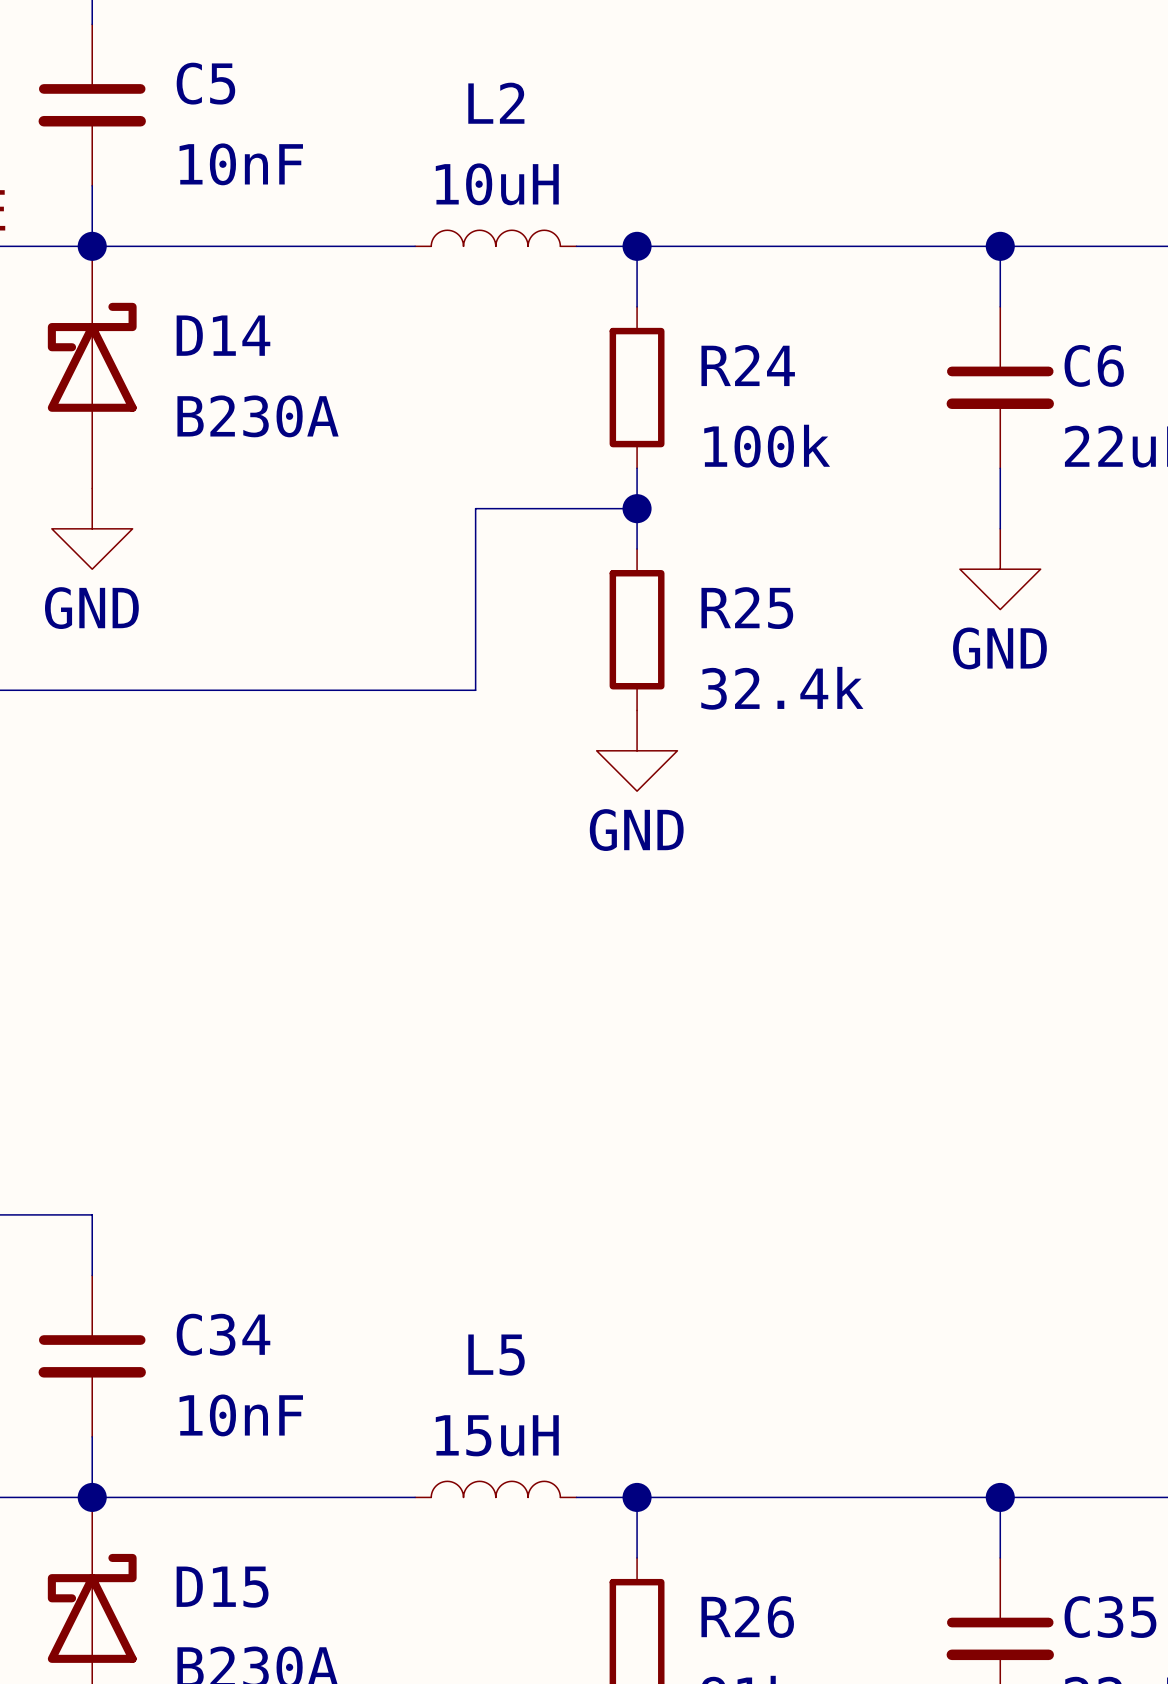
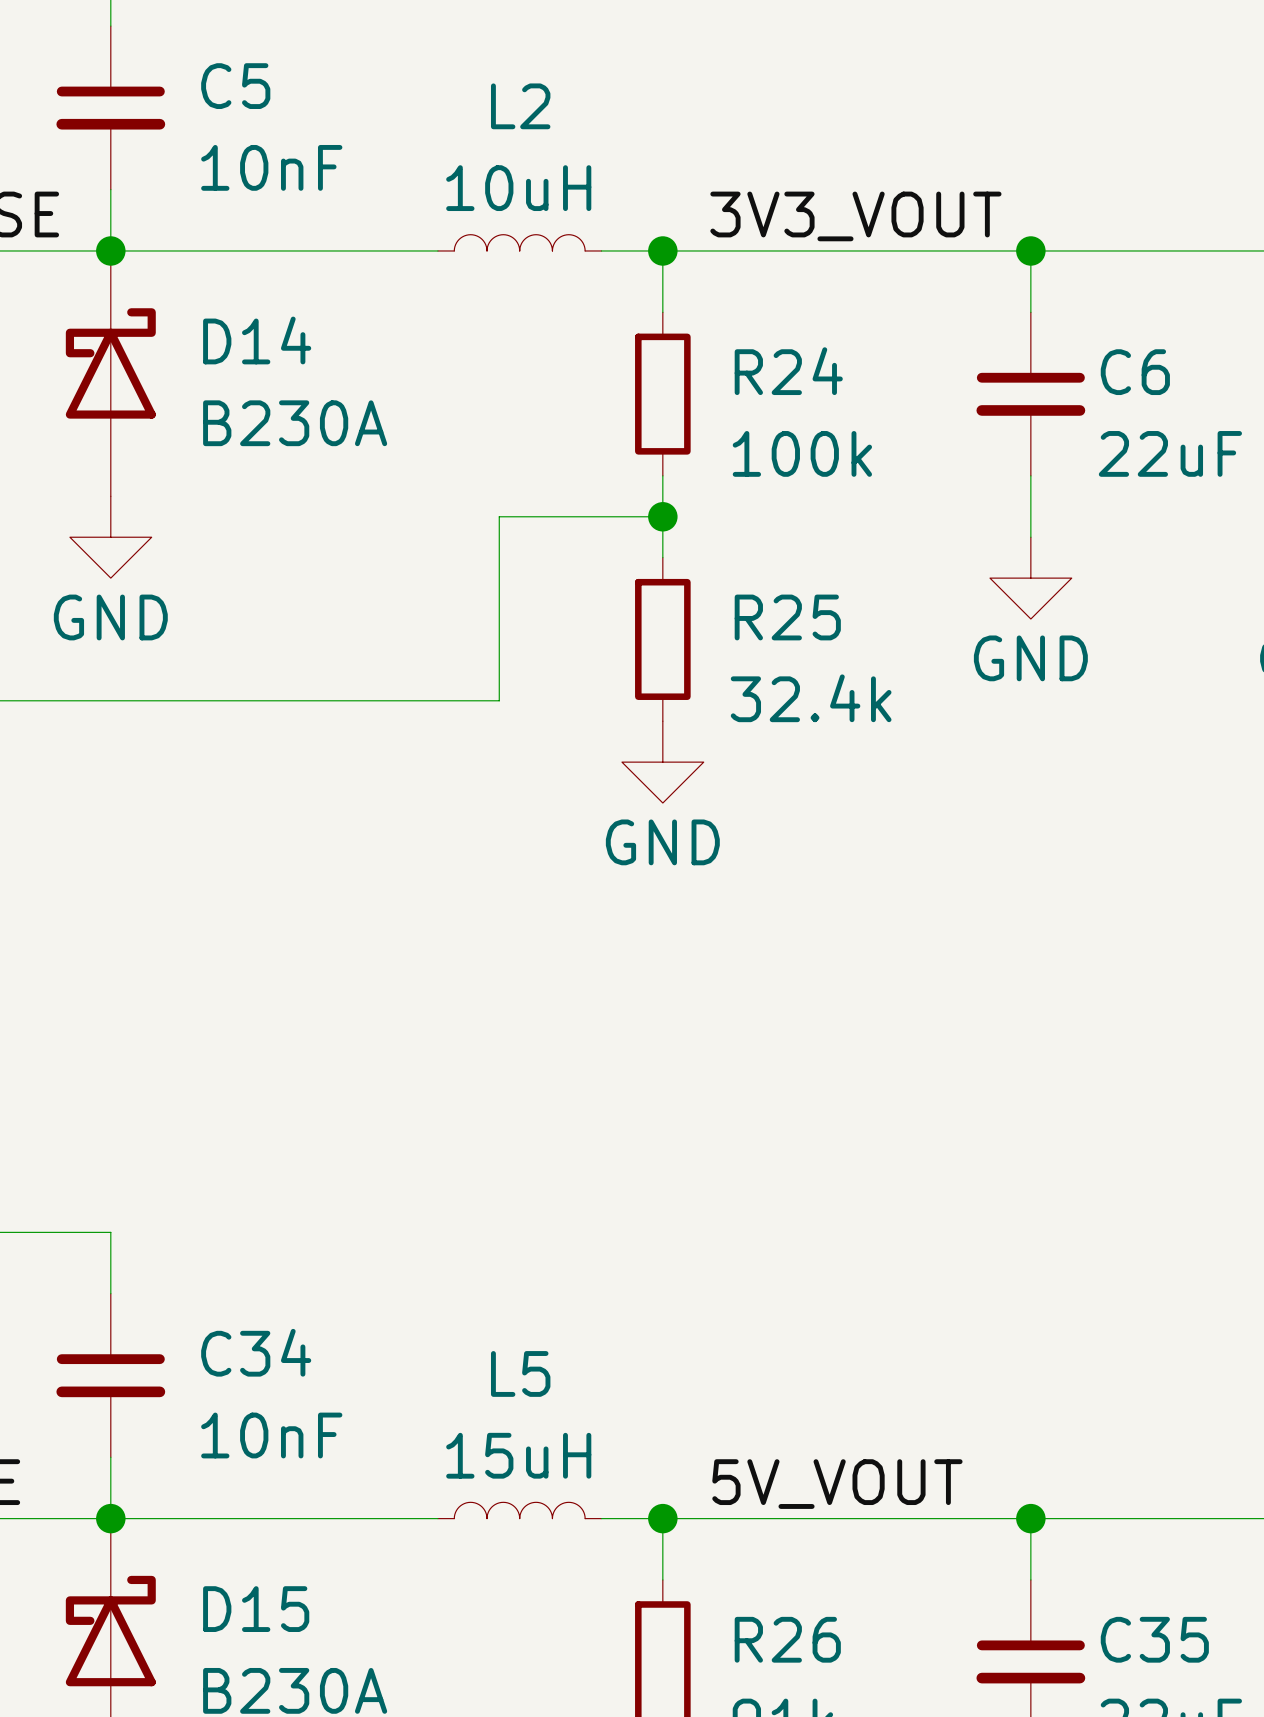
label: none -> 3V3_VOUT (855, 216)
label: none -> 5V_VOUT (837, 1484)

